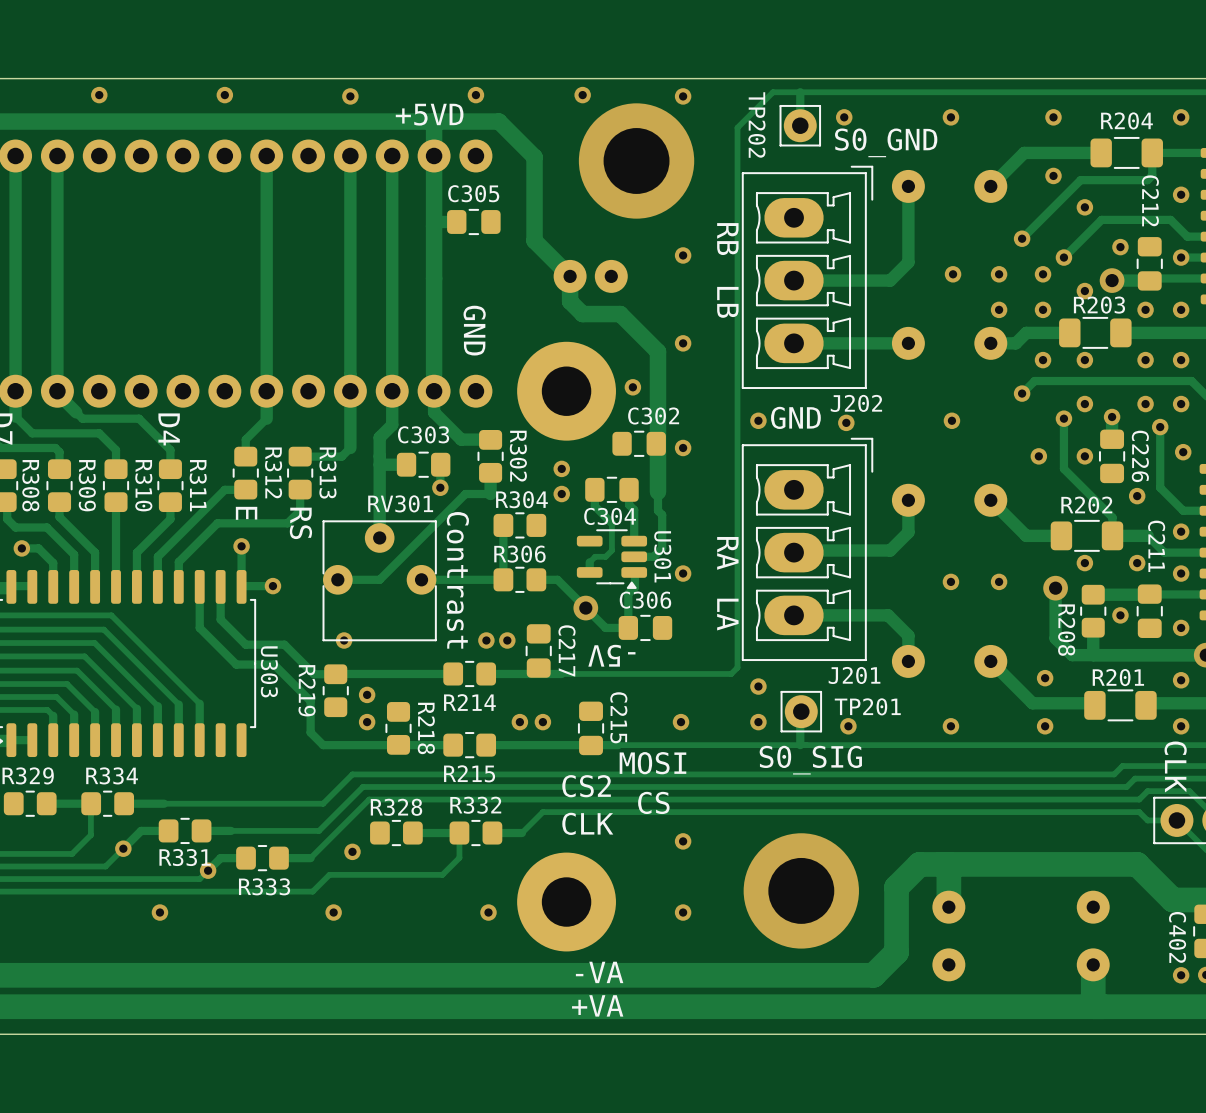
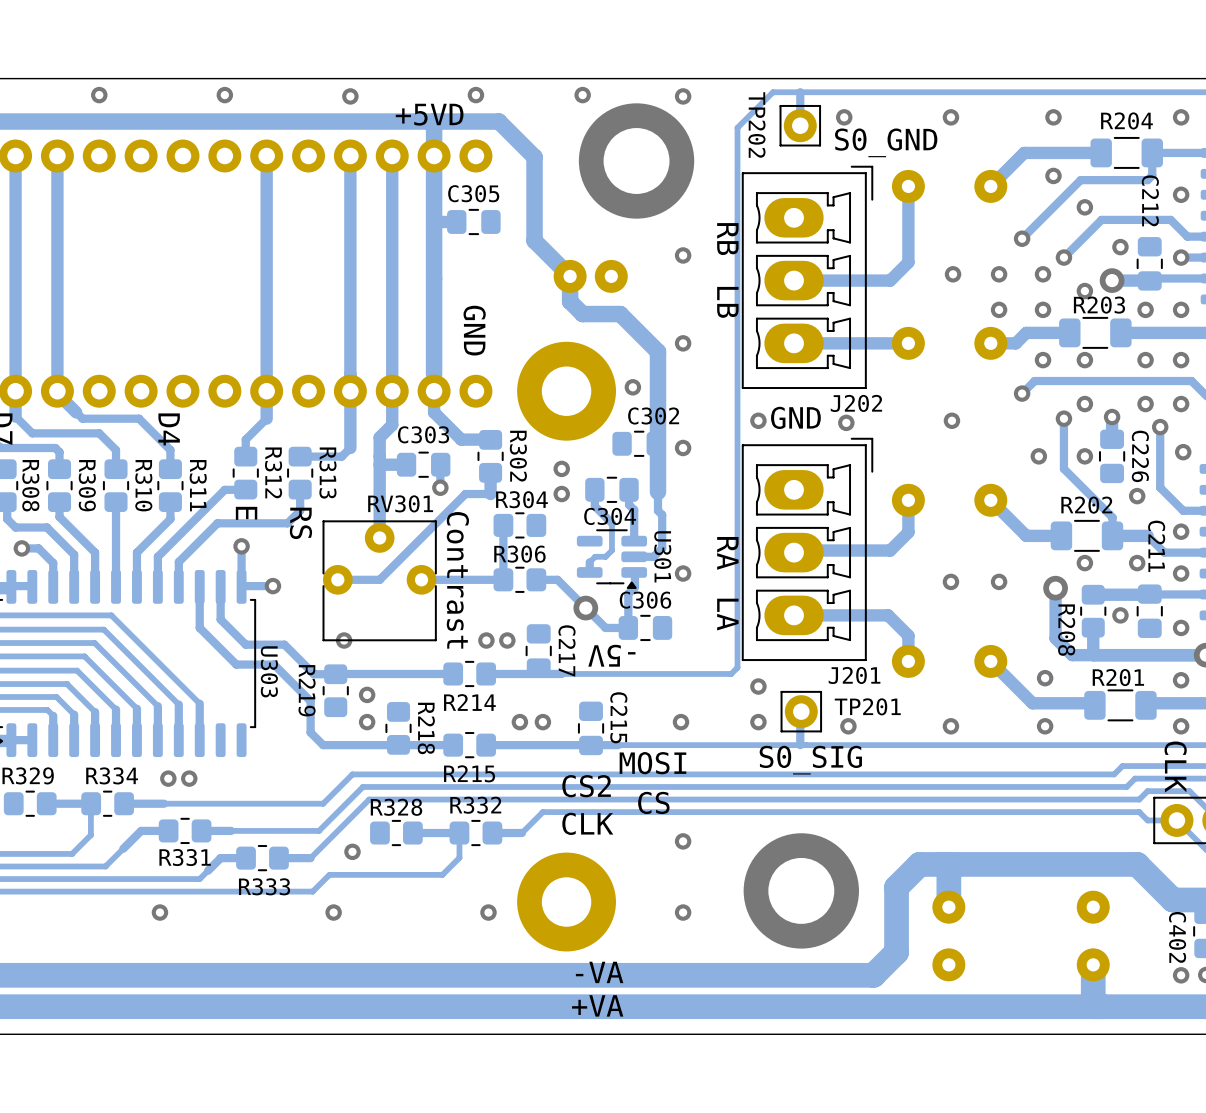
via: none -> (168, 778)
via: none -> (189, 778)
via: (123, 848) -> none
via: (208, 870) -> none

